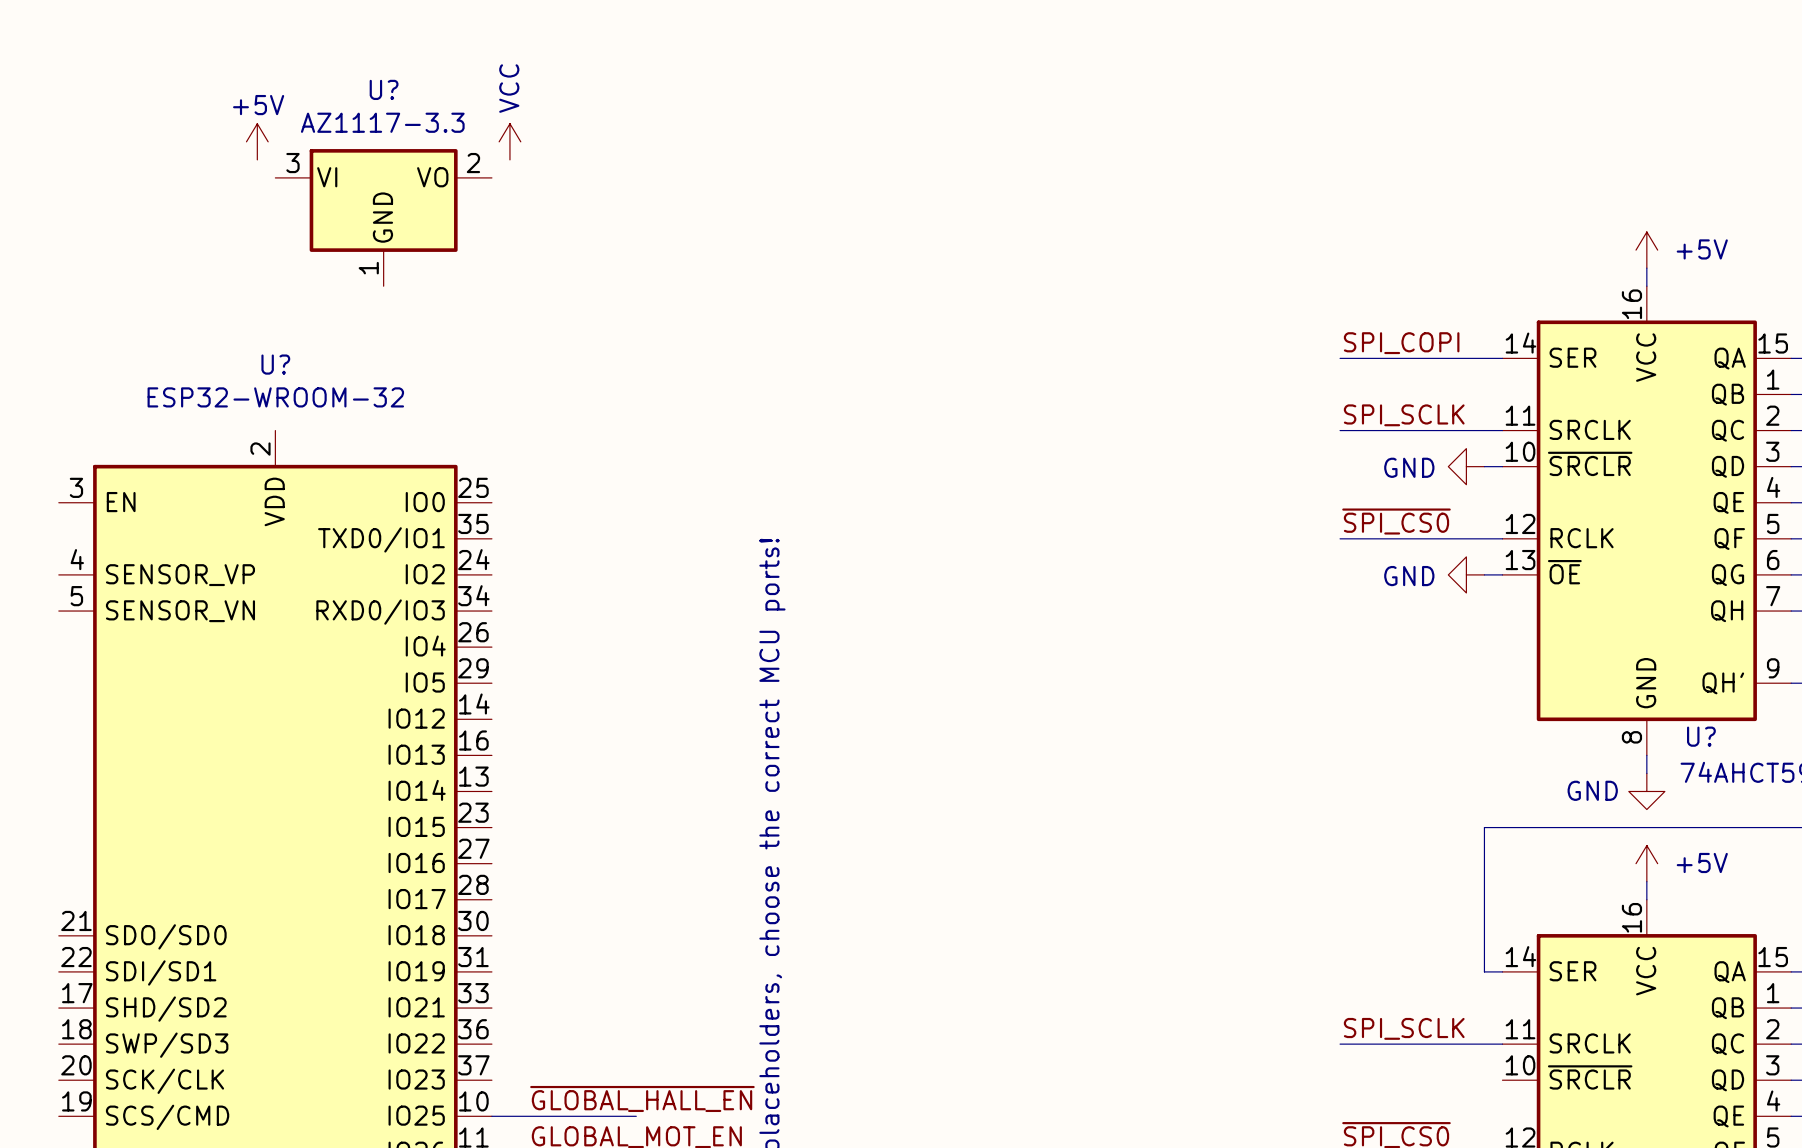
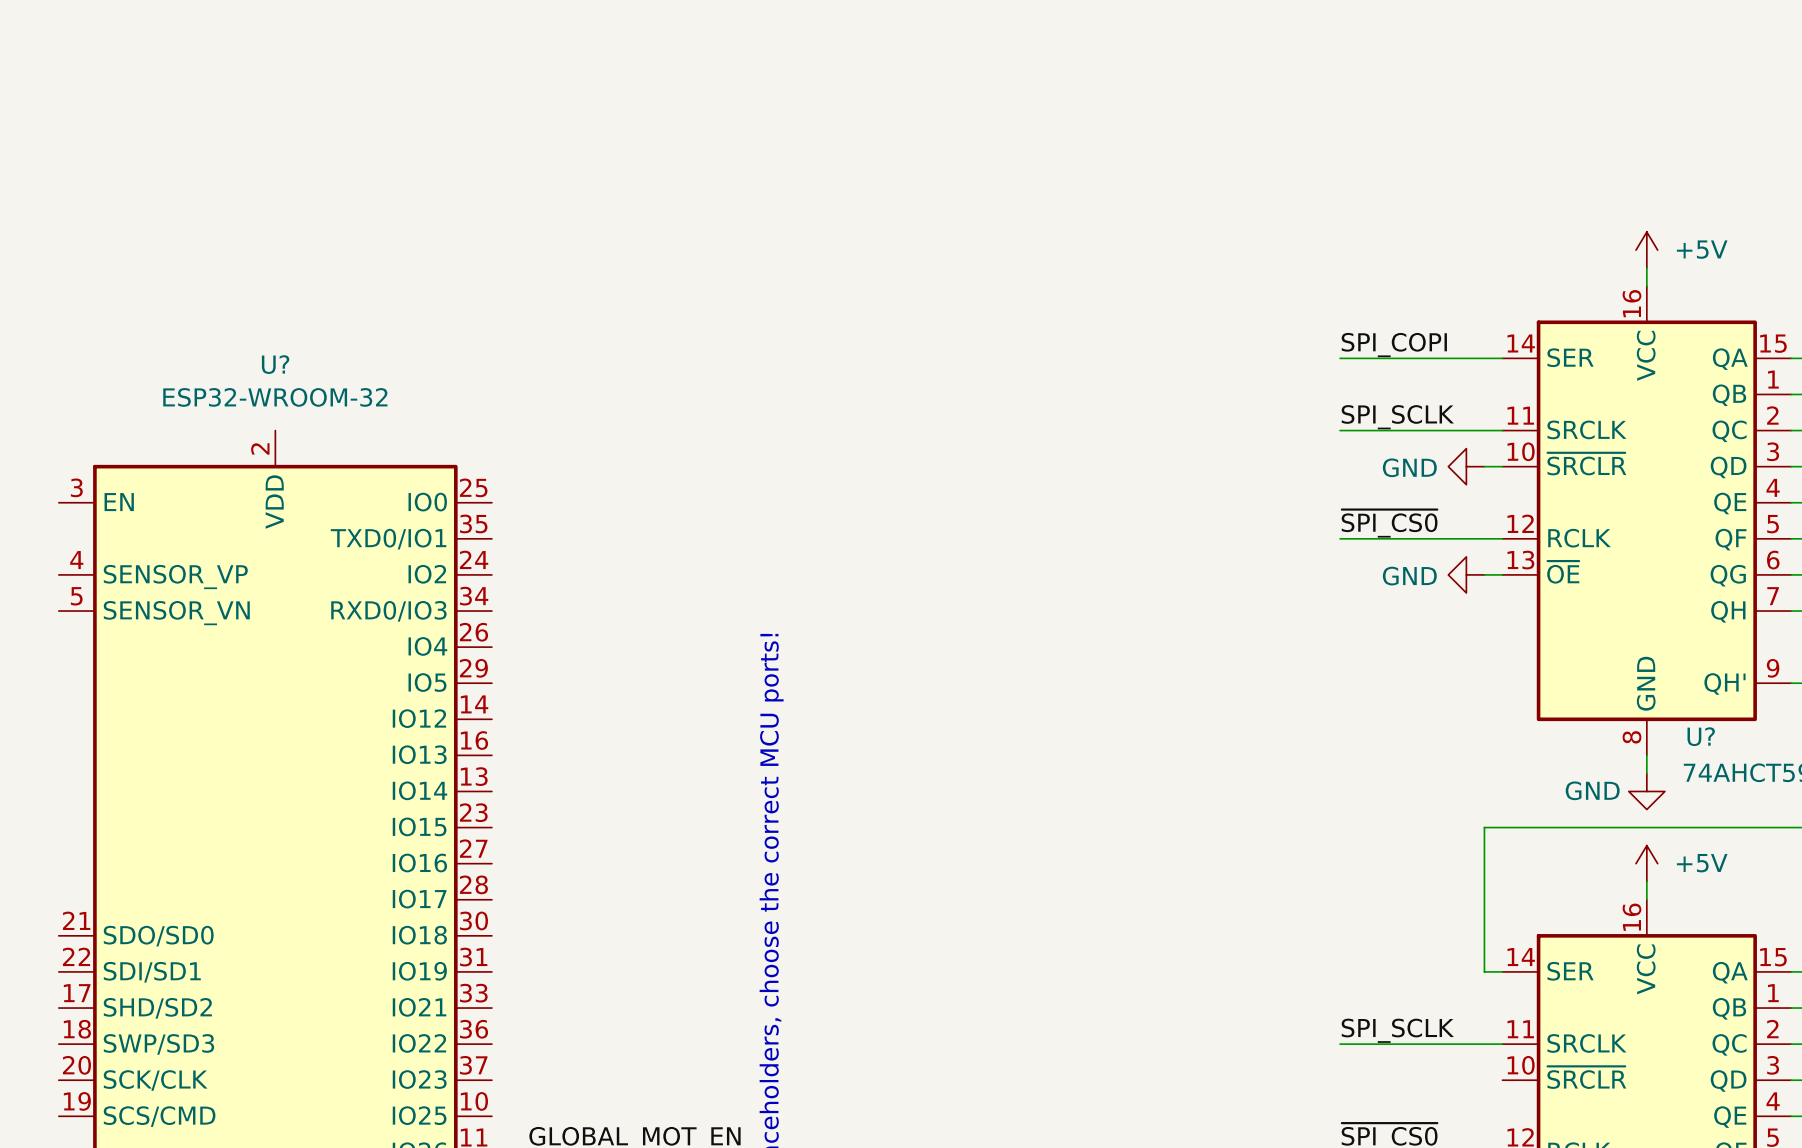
power symbol: +5V (257, 141) -> none
power symbol: VCC (509, 141) -> none
U?: AZ1117-3.3 (383, 217) -> none
label: ~{GLOBAL_HALL_EN} (642, 1098) -> none
wire: (491, 1116) (636, 1116) -> none

